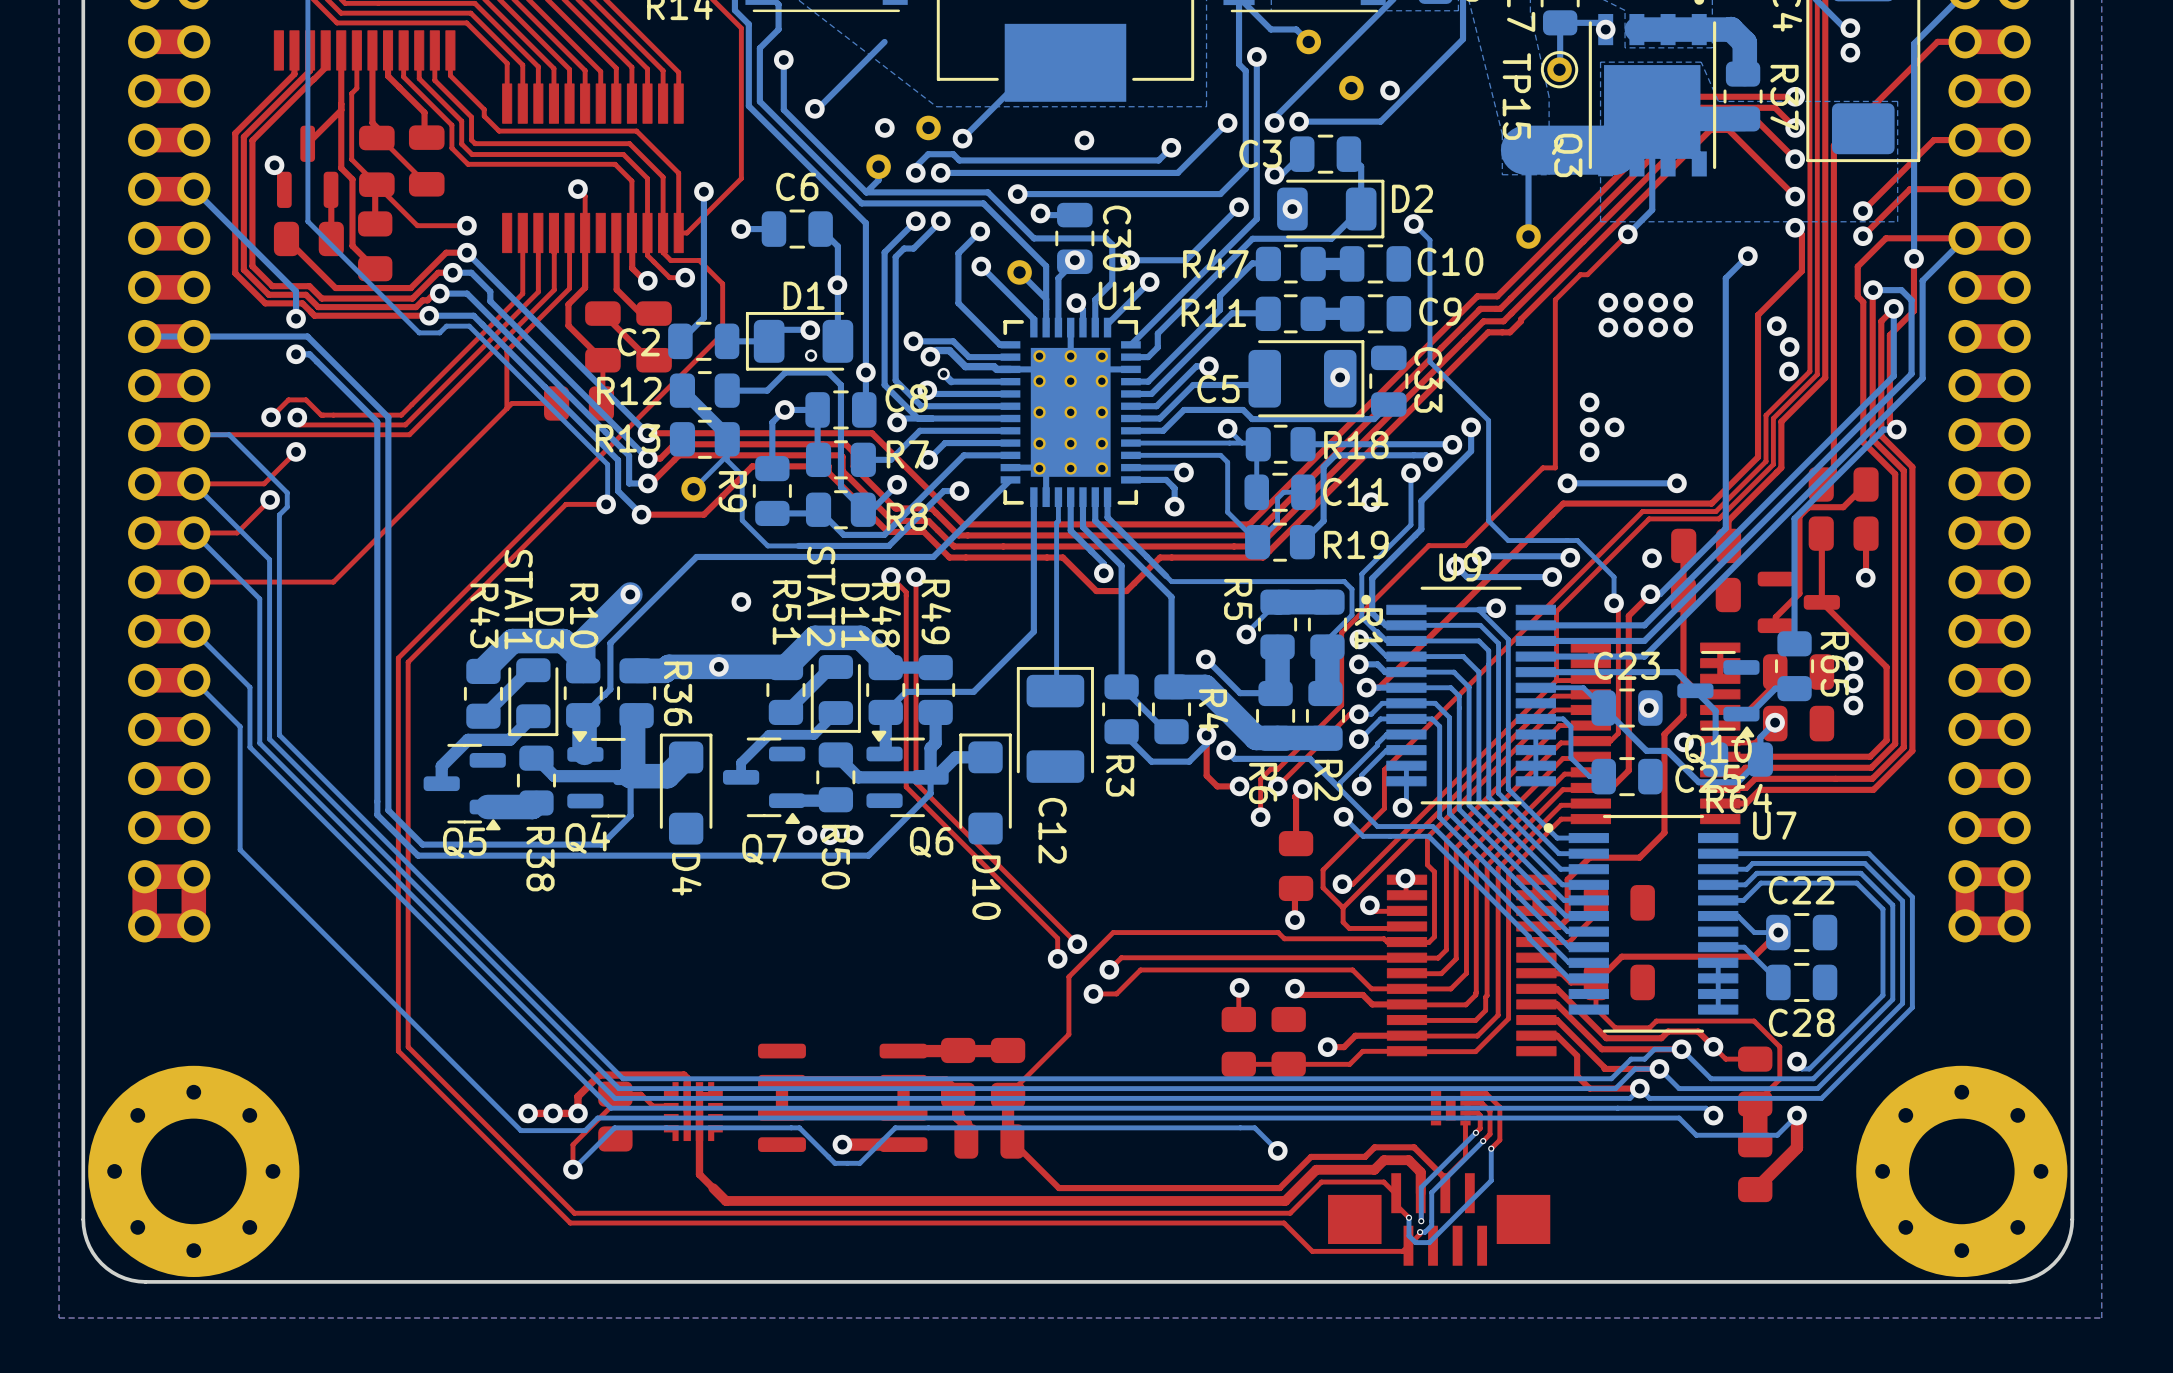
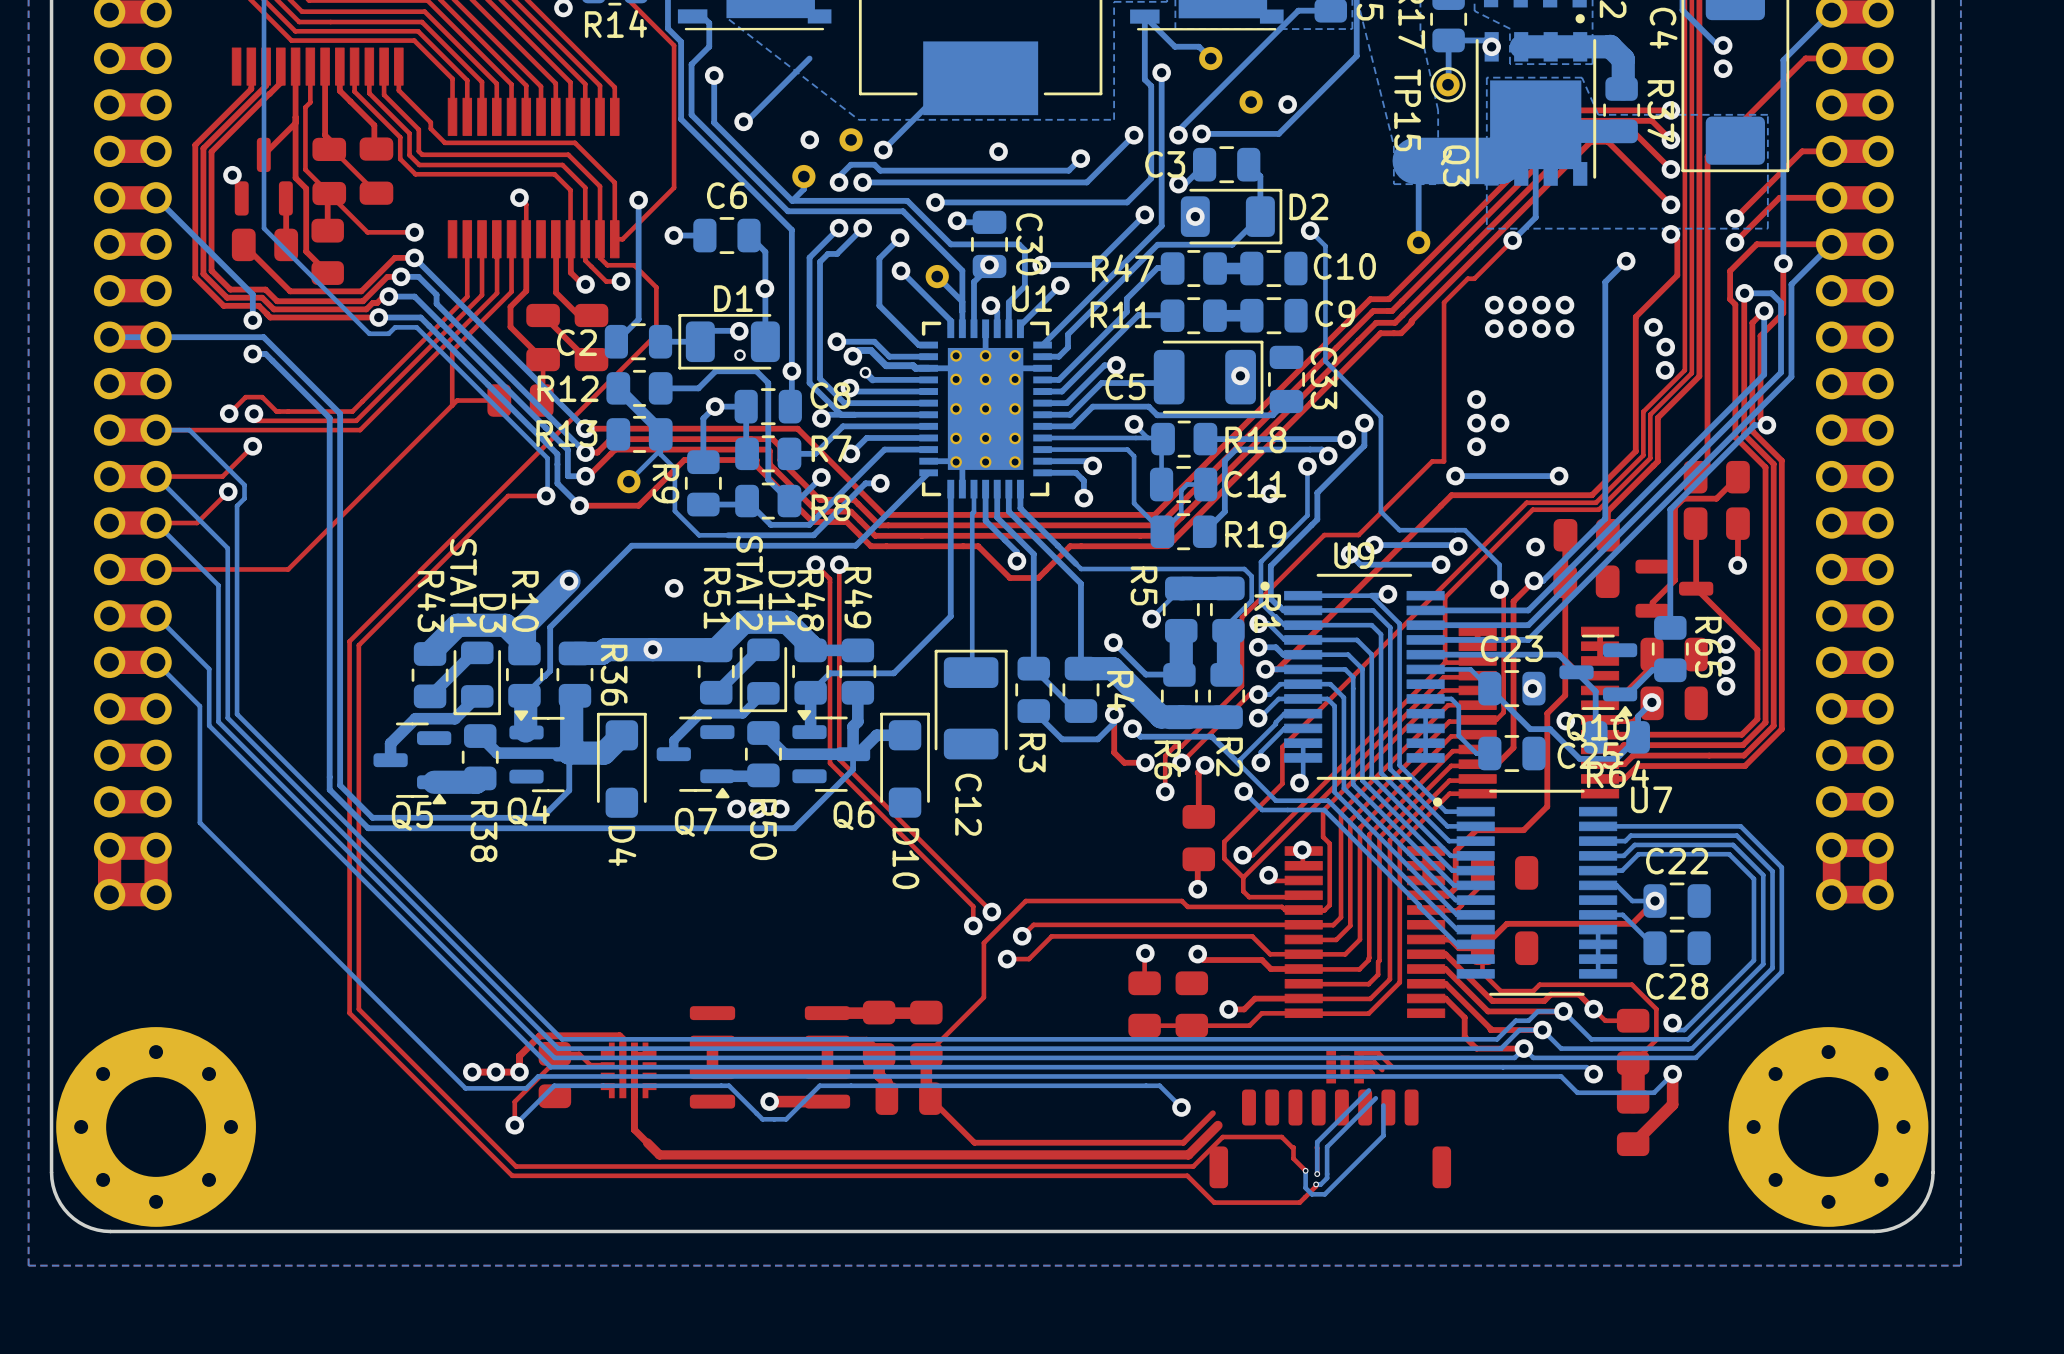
top track: (1499, 1107) (1499, 1140) -> none
top track: (1490, 1111) (1490, 1134) (1483, 1141) -> none
top track: (1480, 1115) (1480, 1128) (1475, 1132) -> none
top track: (1465, 1122) (1465, 1157) (1445, 1178) (1445, 1193) (1445, 1178) (1414, 1147) (1374, 1147) (1365, 1156) (1311, 1156) -> none
via: (1475, 1132) -> none
via: (1483, 1141) -> none
via: (1491, 1148) -> none
top track: (1316, 1169) (1374, 1169) (1384, 1160) (1408, 1160) (1420, 1172) (1420, 1193) -> none
part: none -> (1330, 1138)
part: (1439, 1219) -> none

